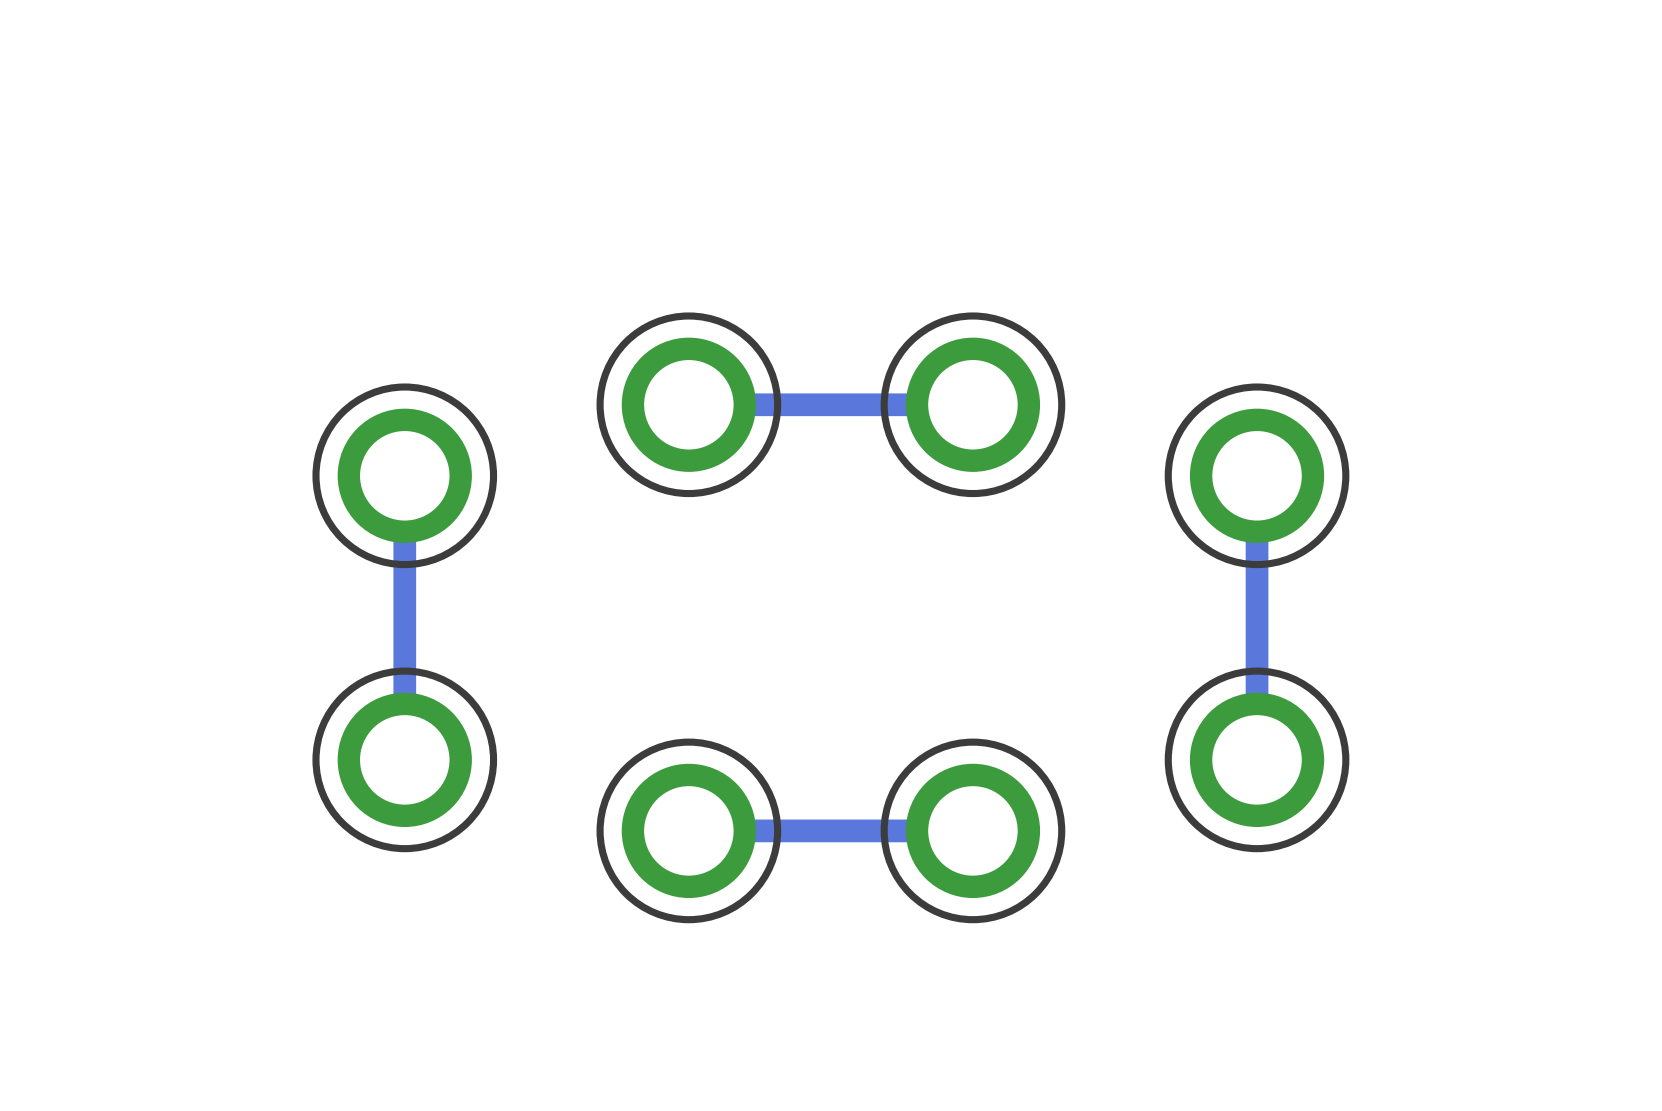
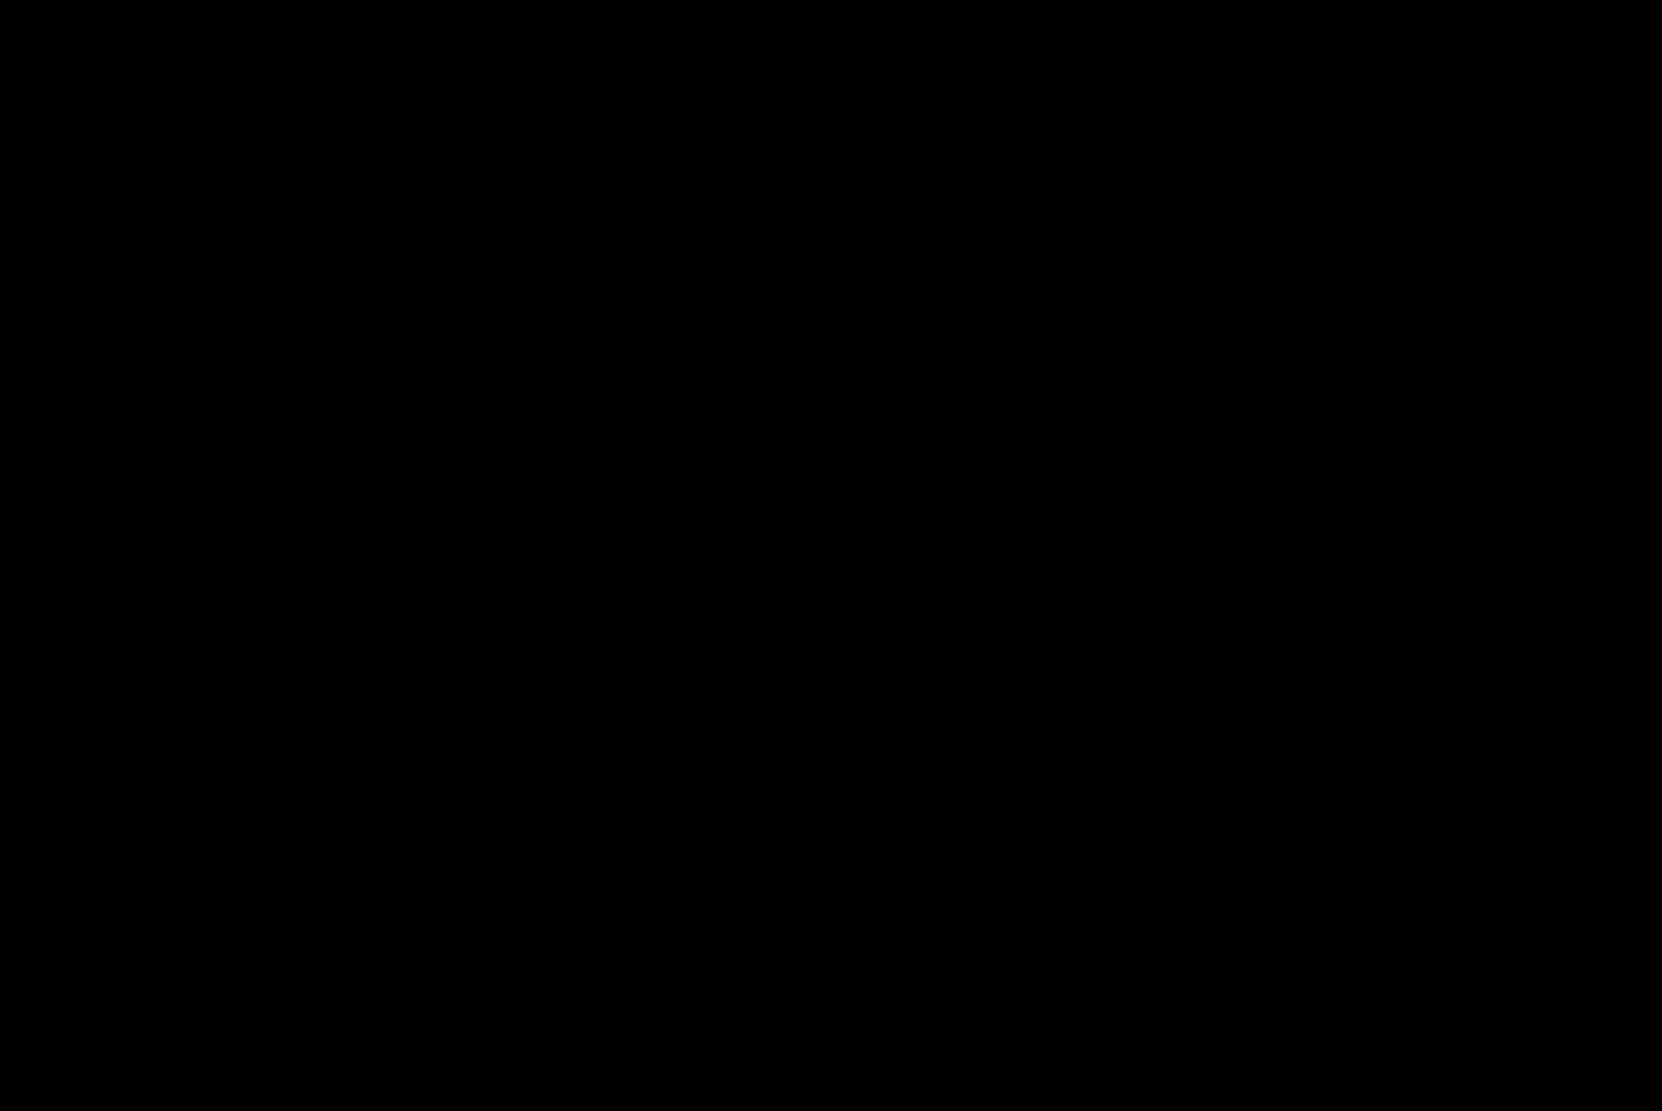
bottom track: (688, 404) (972, 404) -> none
part: (688, 404) -> none
part: (972, 404) -> none
bottom track: (404, 475) (404, 759) -> none
part: (404, 475) -> none
bottom track: (1257, 475) (1257, 759) -> none
part: (1257, 475) -> none
part: (404, 759) -> none
part: (1257, 759) -> none
bottom track: (688, 830) (972, 830) -> none
part: (688, 830) -> none
part: (972, 830) -> none

